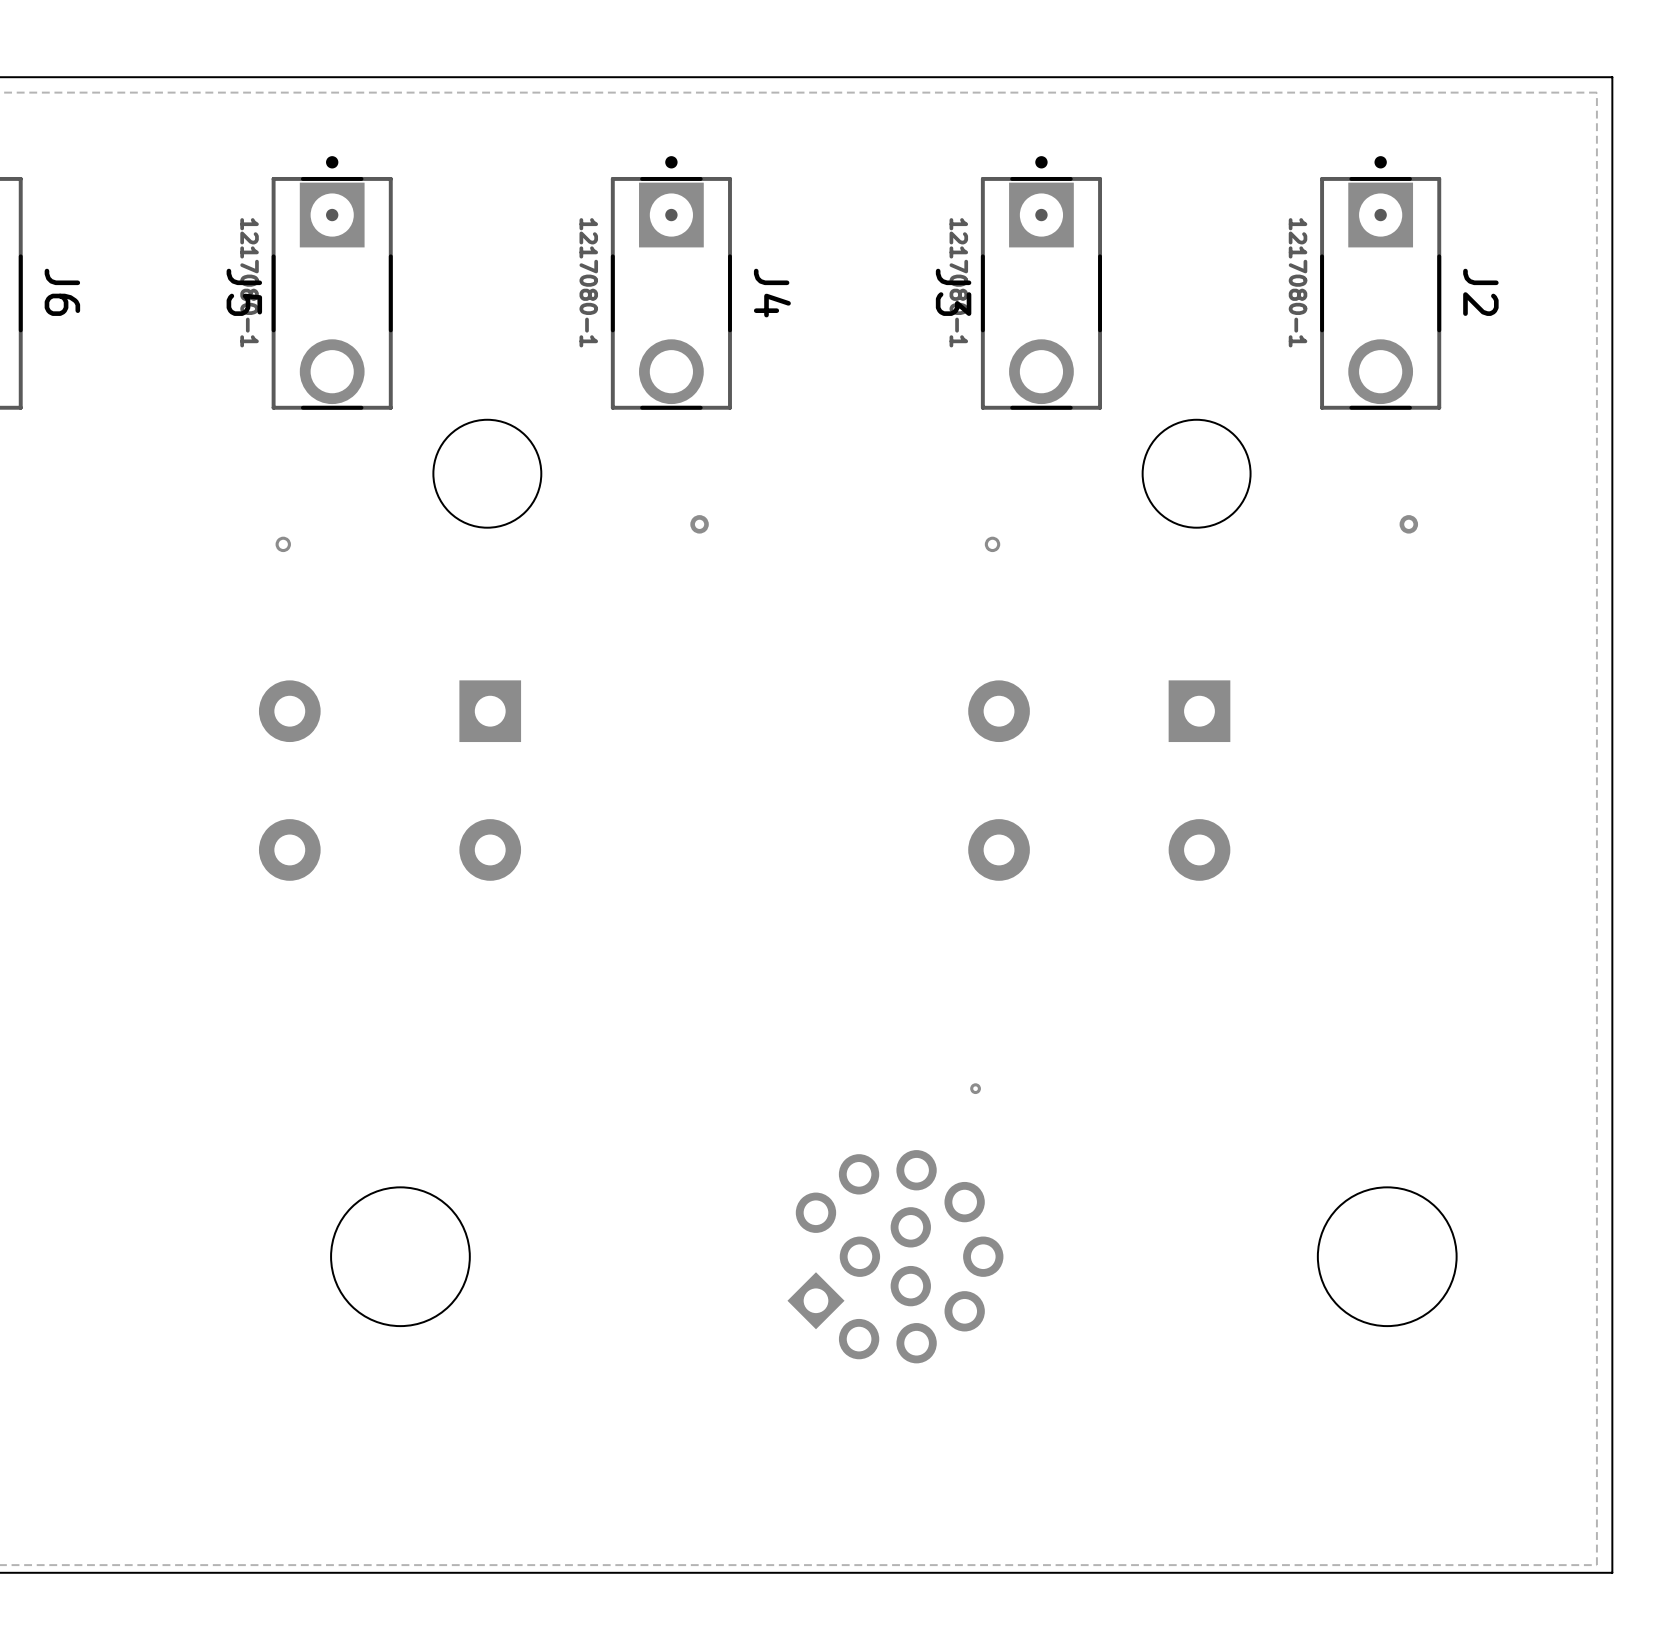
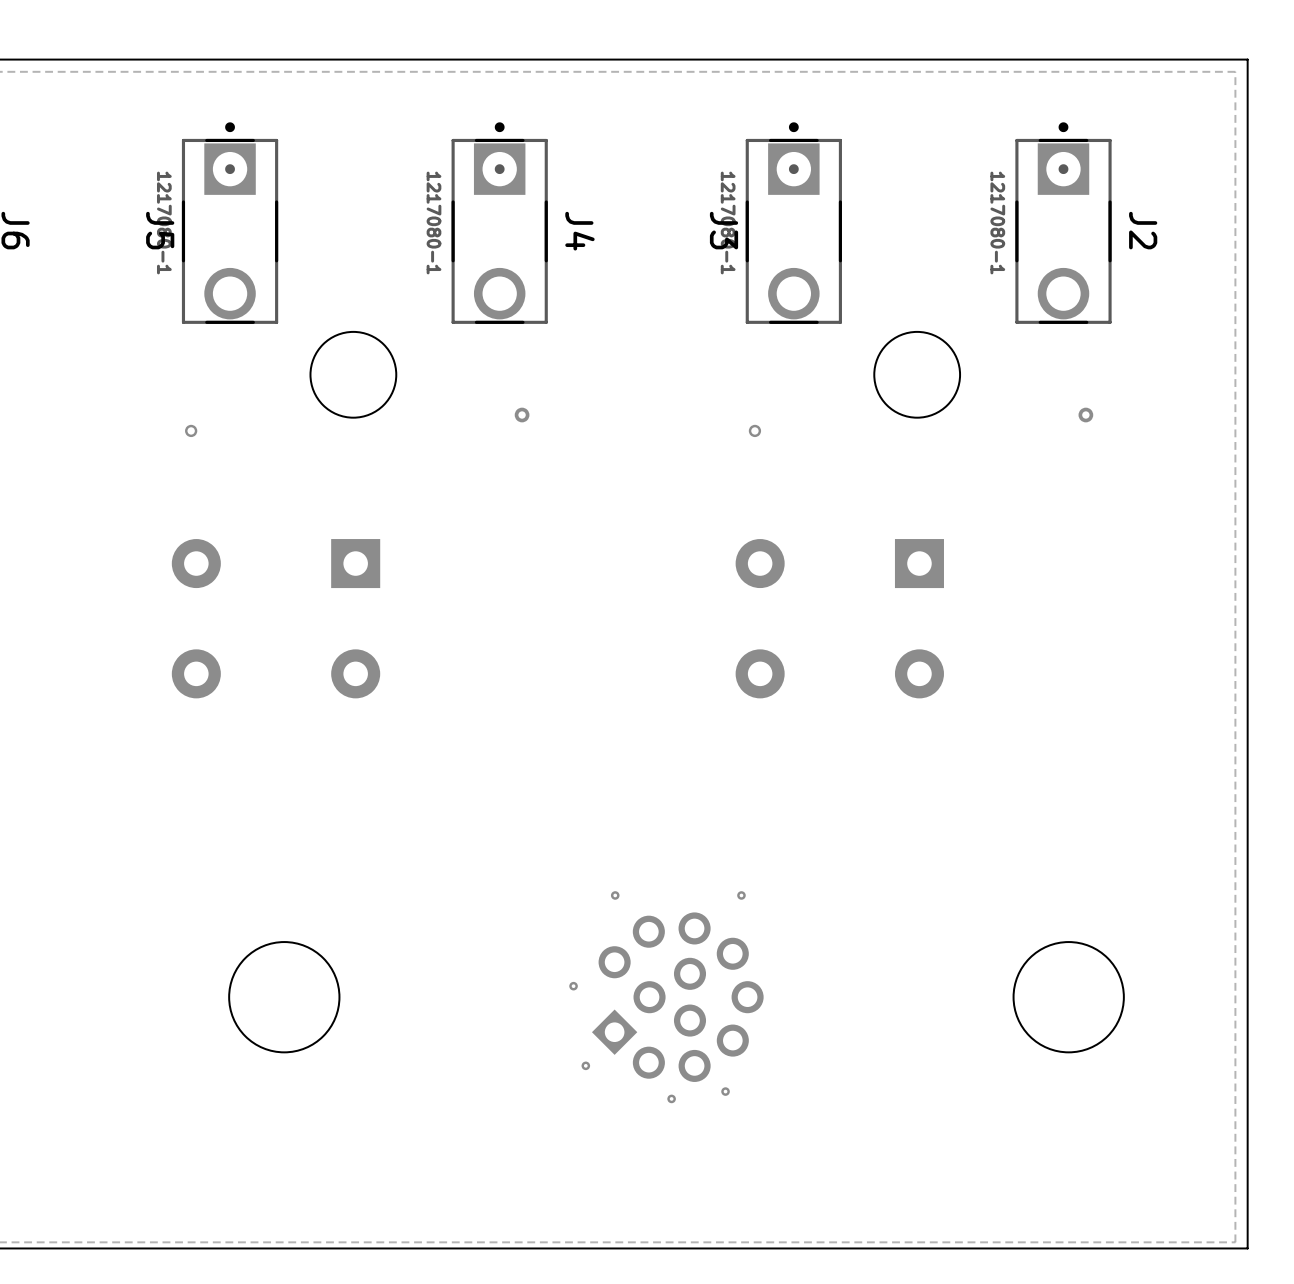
via position: (975, 1088) -> (741, 895)
via: none -> (615, 895)
via: none -> (573, 986)
via: none -> (585, 1065)
via: none -> (725, 1091)
via: none -> (671, 1098)

